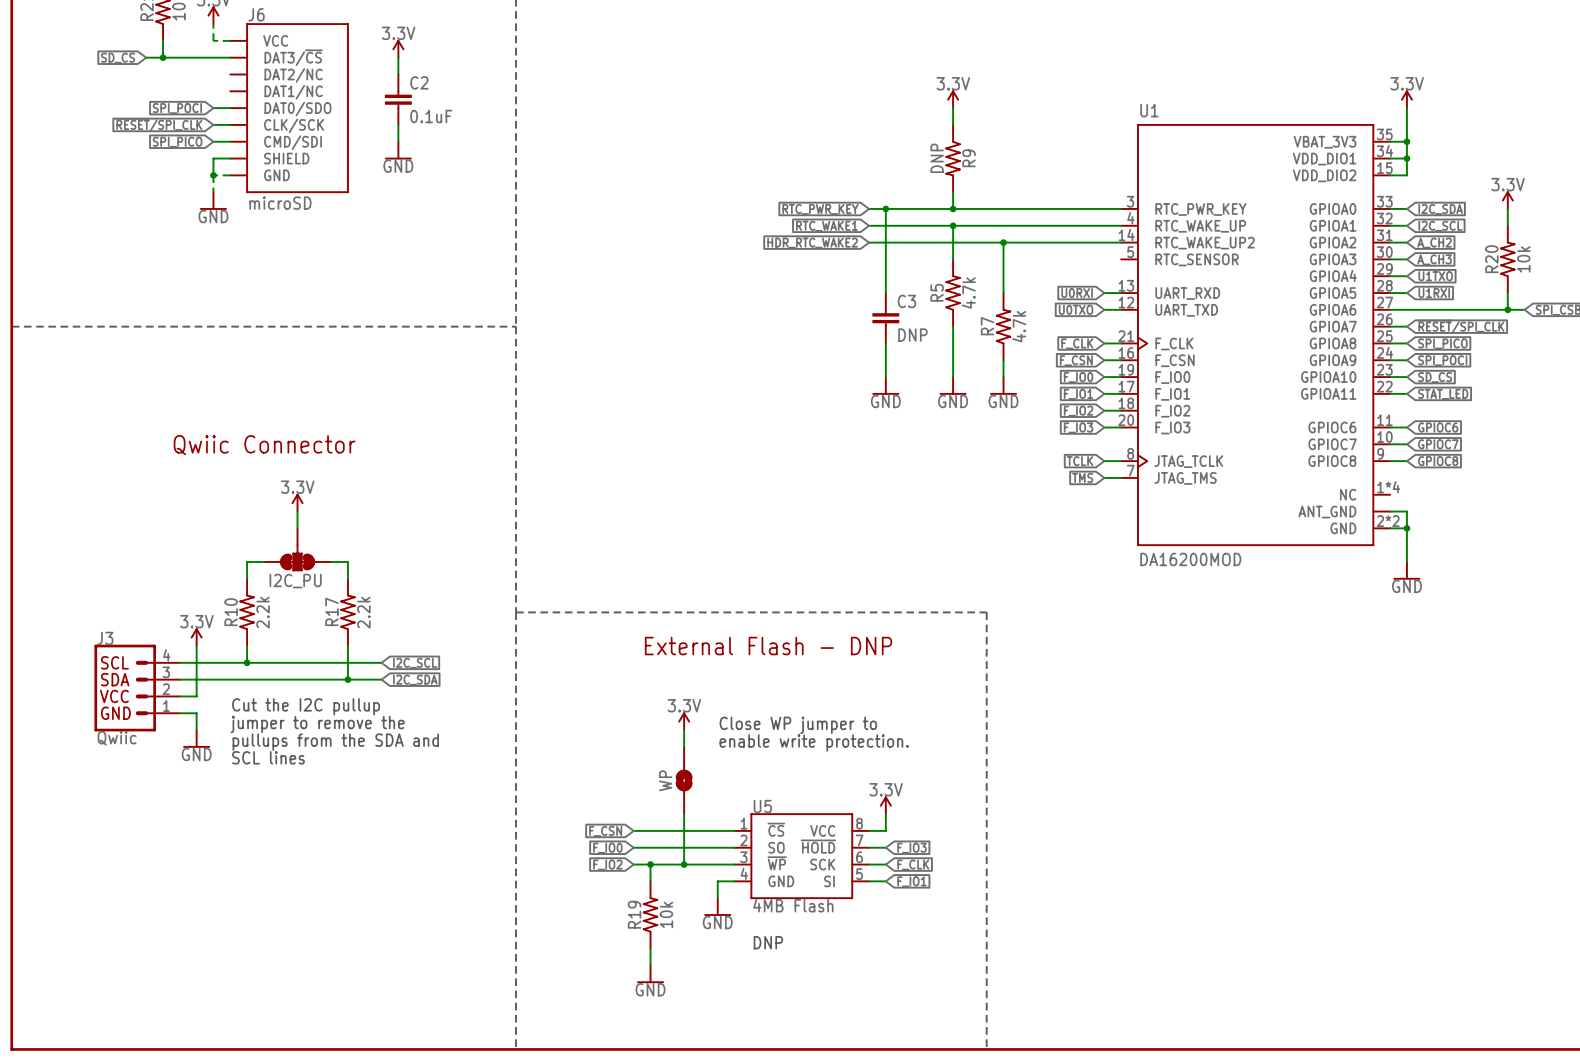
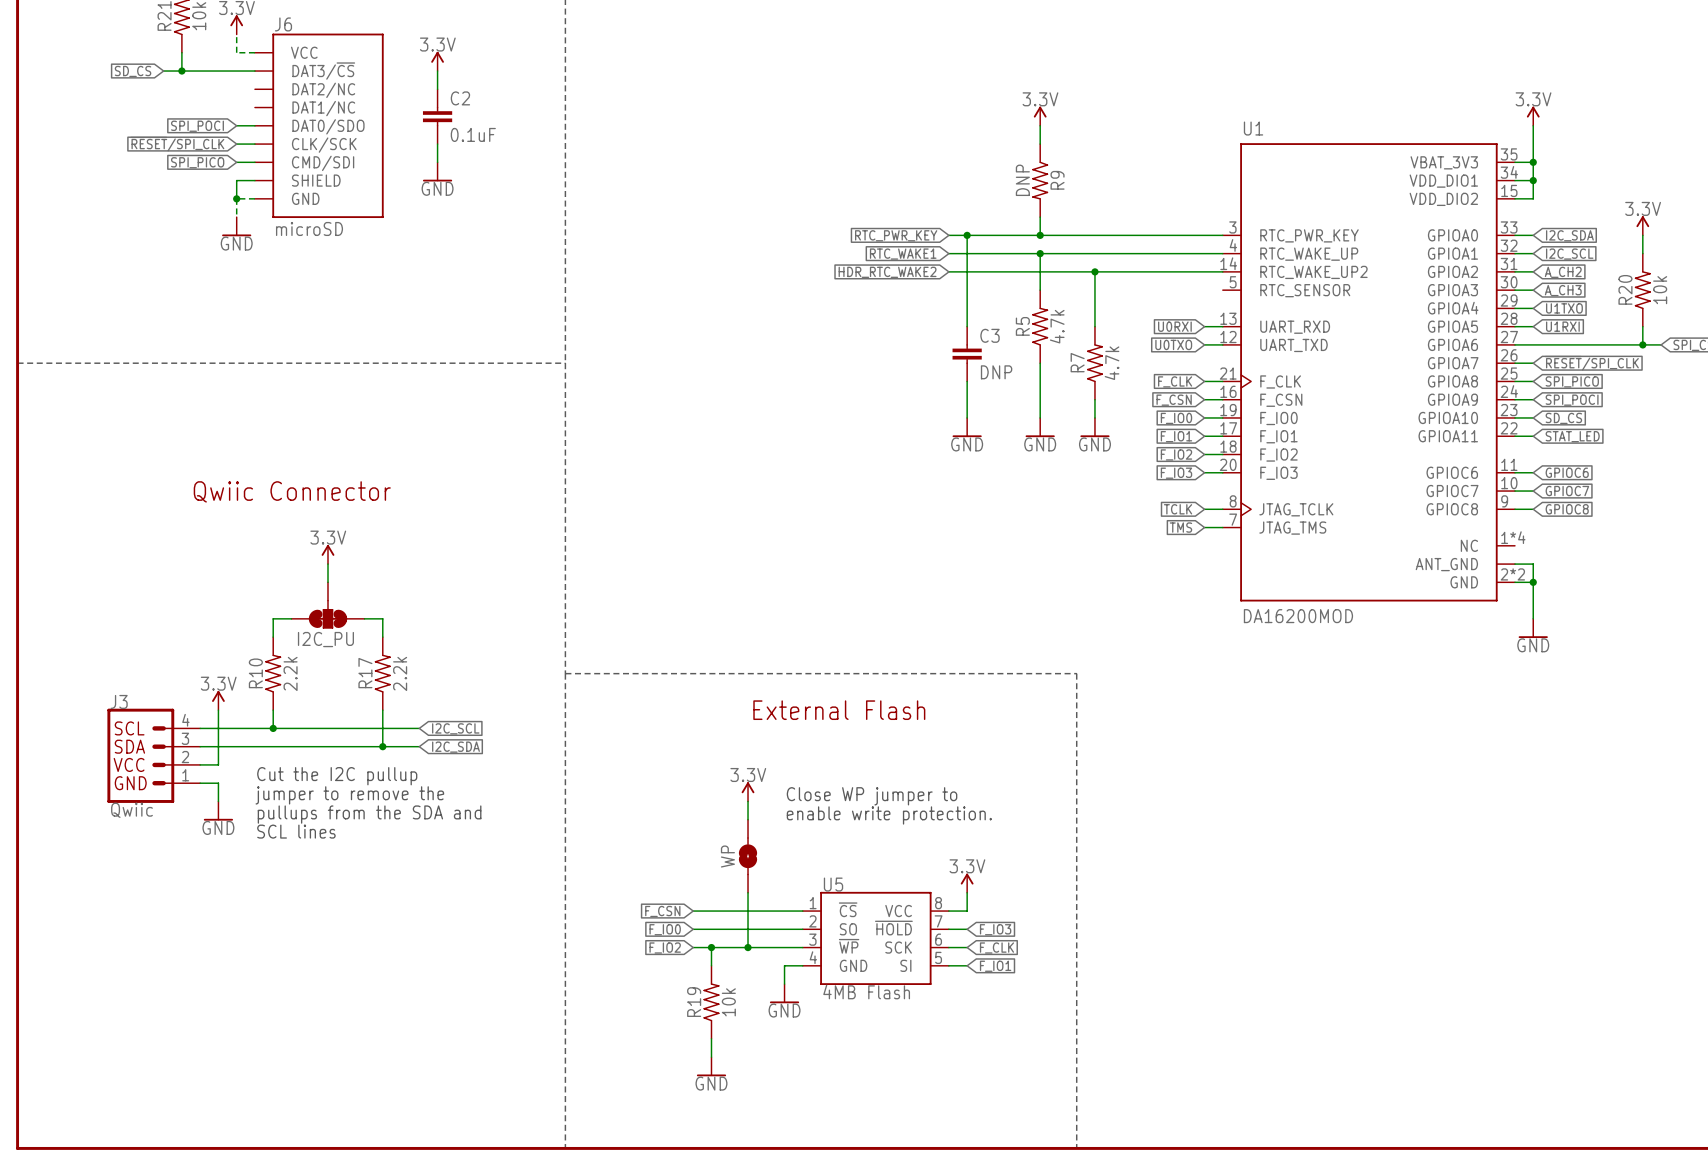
text: External Flash - DNP (768, 646) -> External Flash (839, 710)
text: DNP (768, 942) -> none

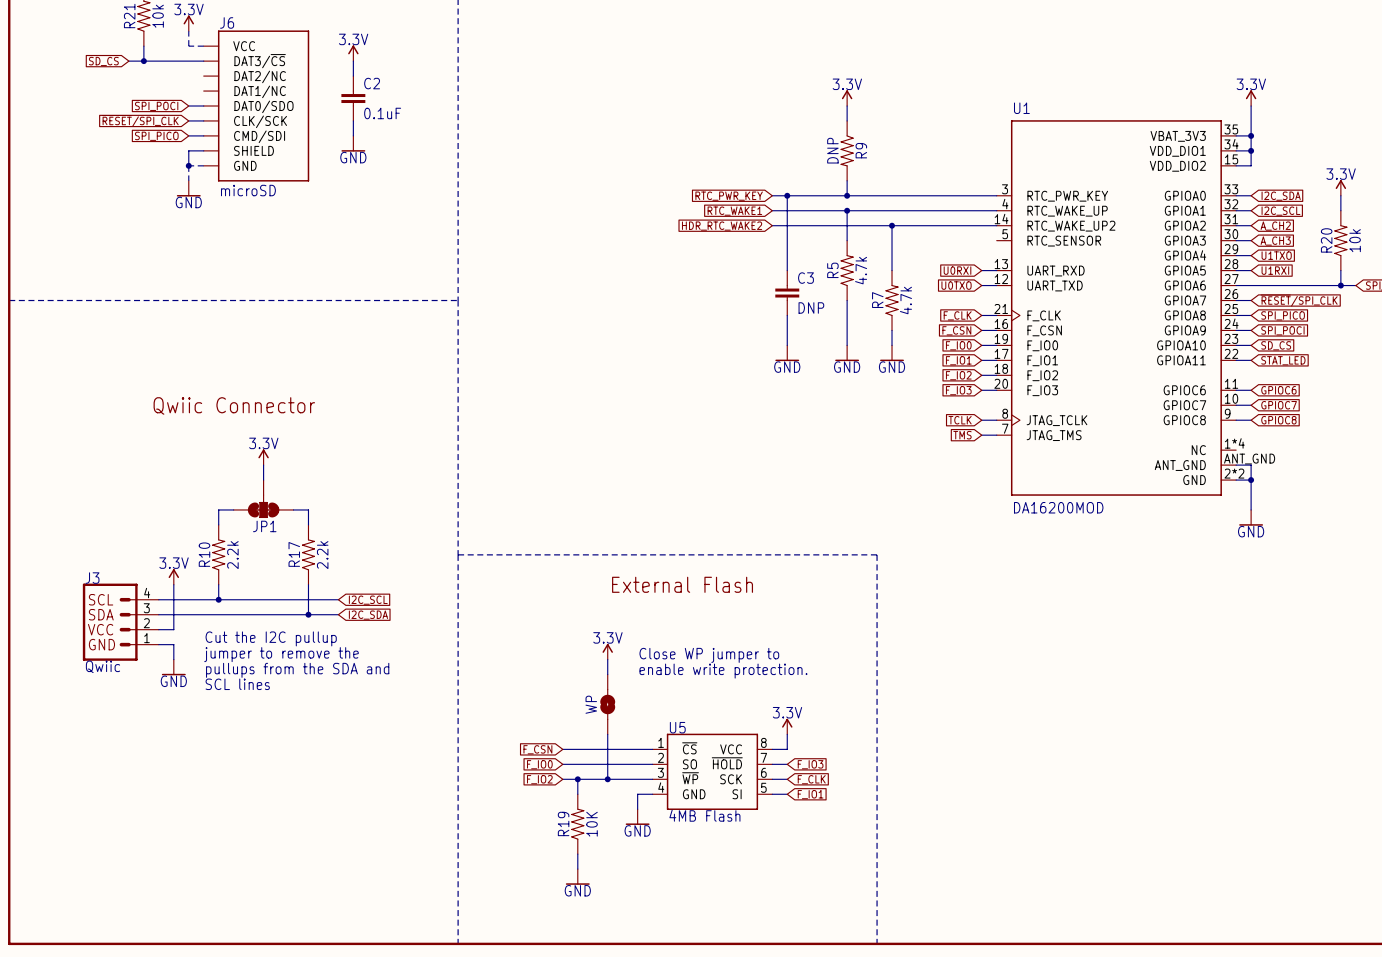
U1 pin number: none -> ANT_GND (1249, 459)
I2C_PU name: I2C_PU (325, 639) -> JP1 (264, 526)
R19 value: 10k (728, 1002) -> 10K (592, 824)

